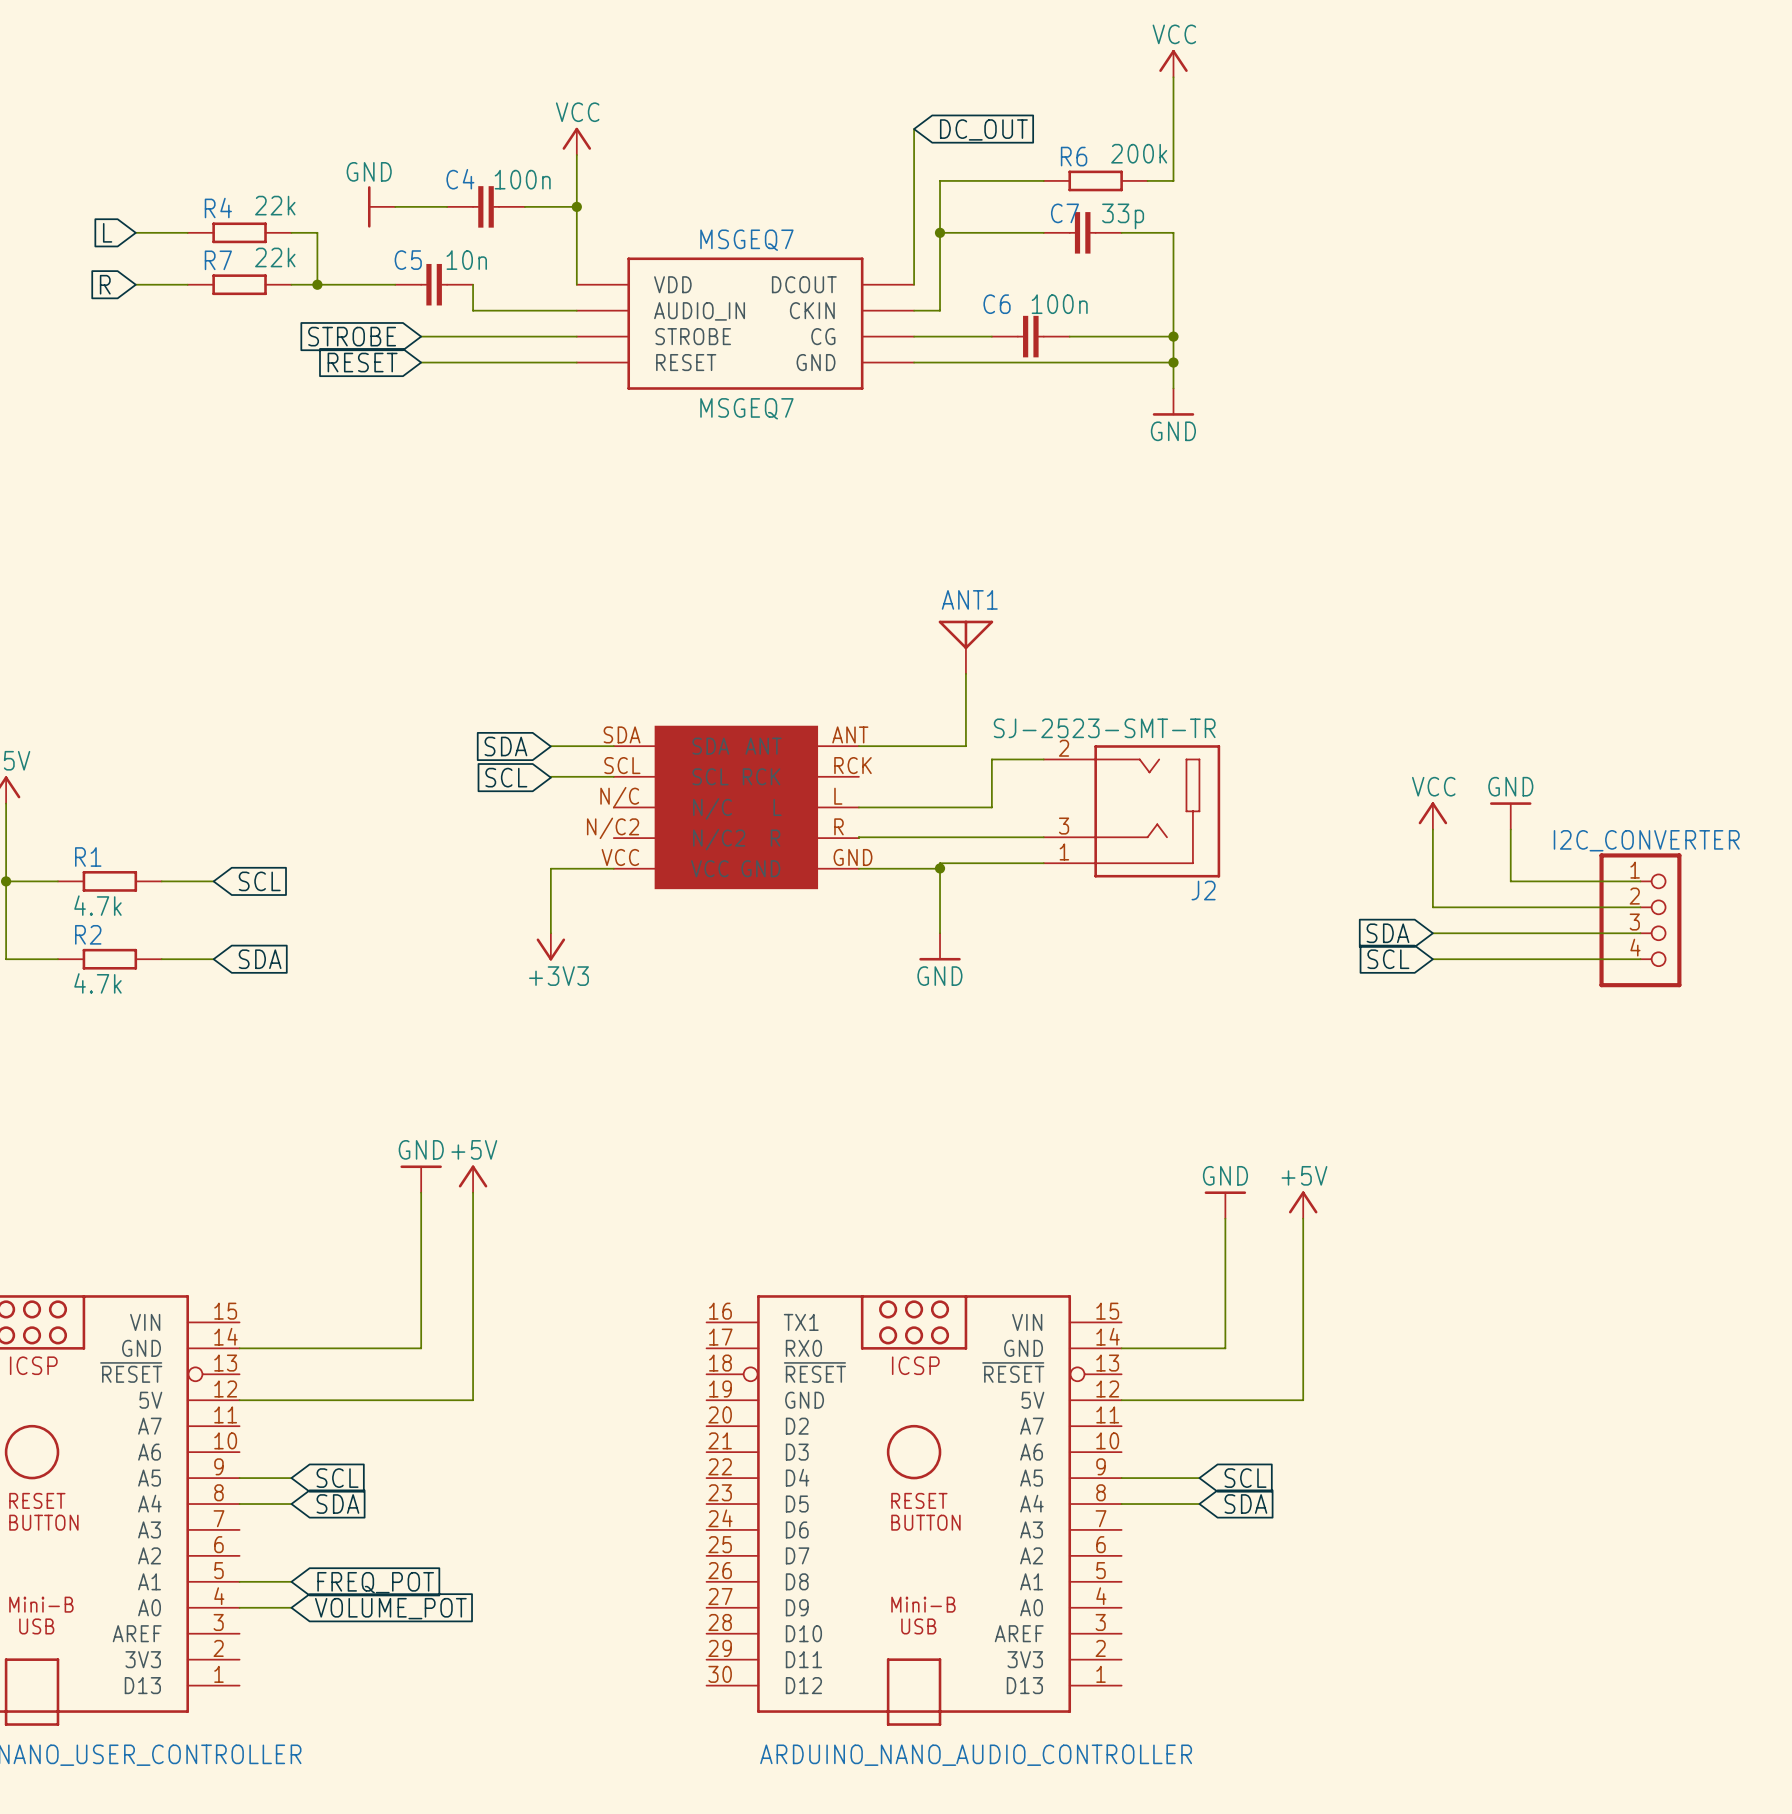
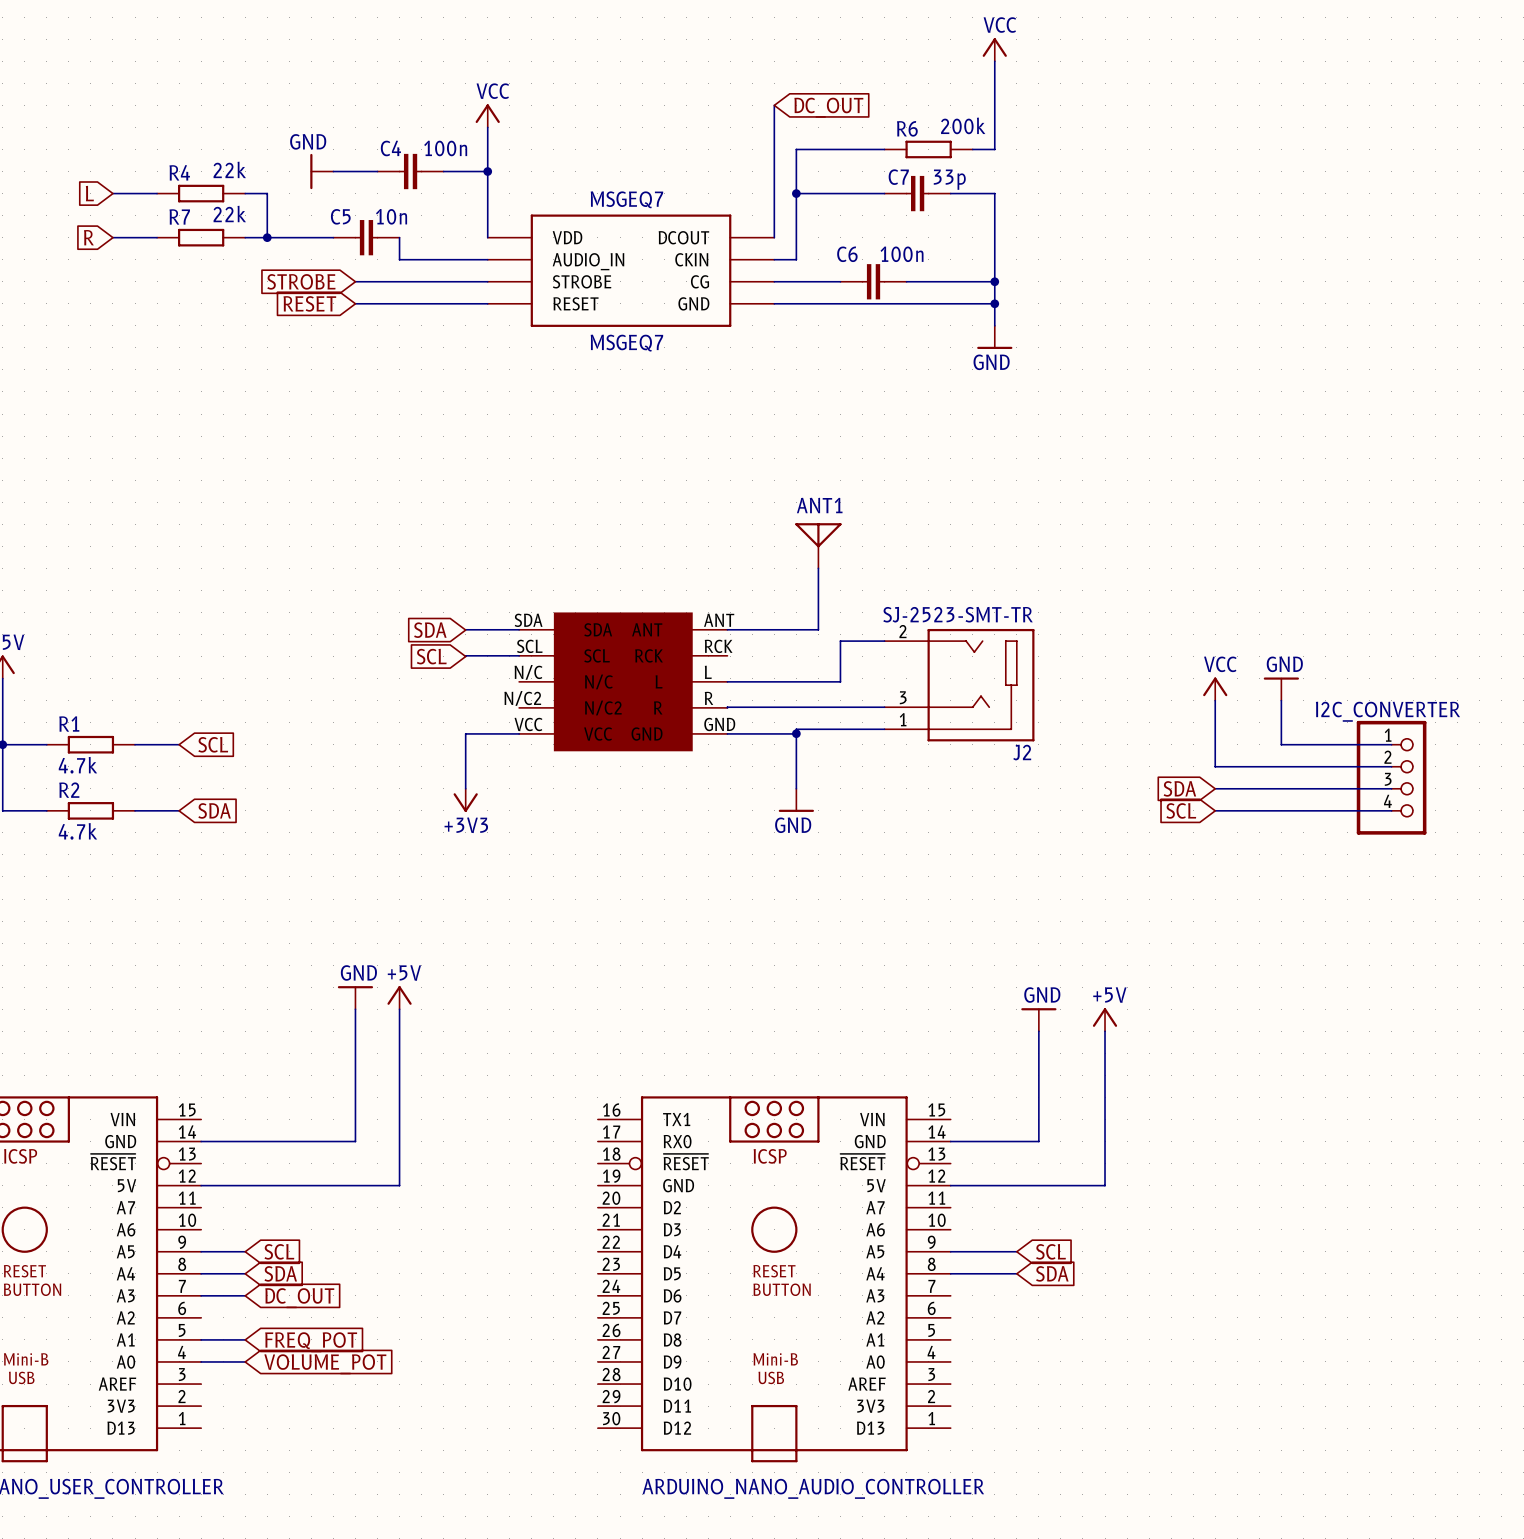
wire: none -> (201, 1295) (245, 1295)
global label: none -> DC_OUT (299, 1298)

